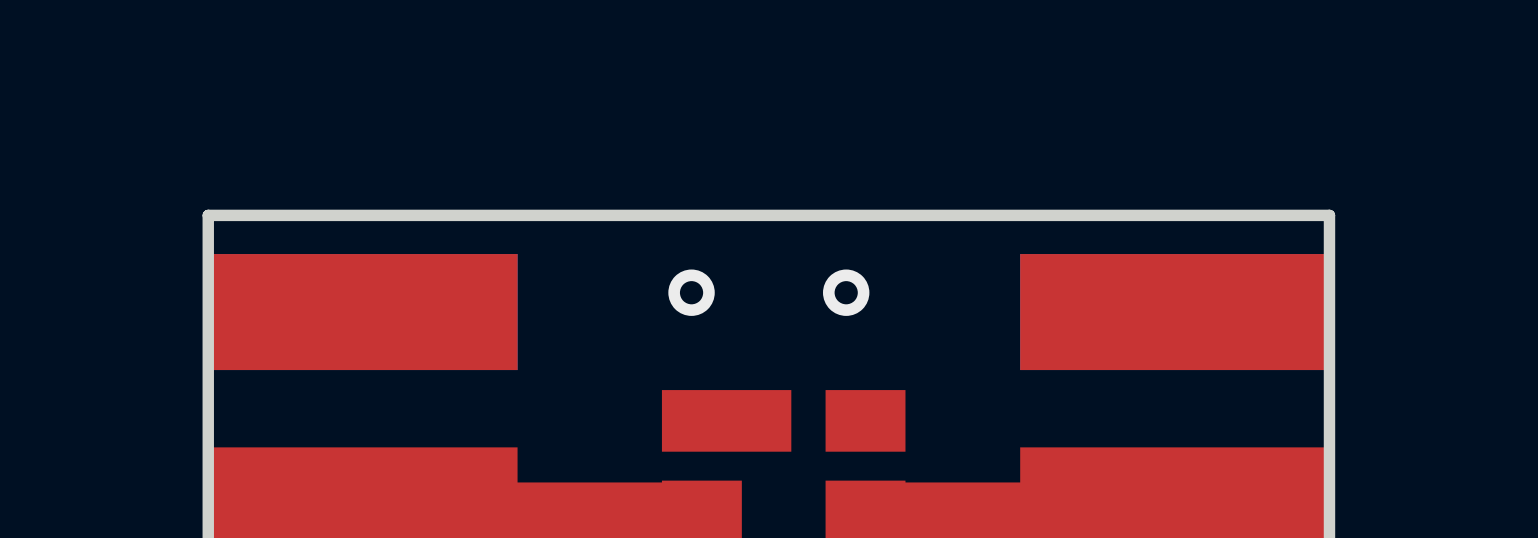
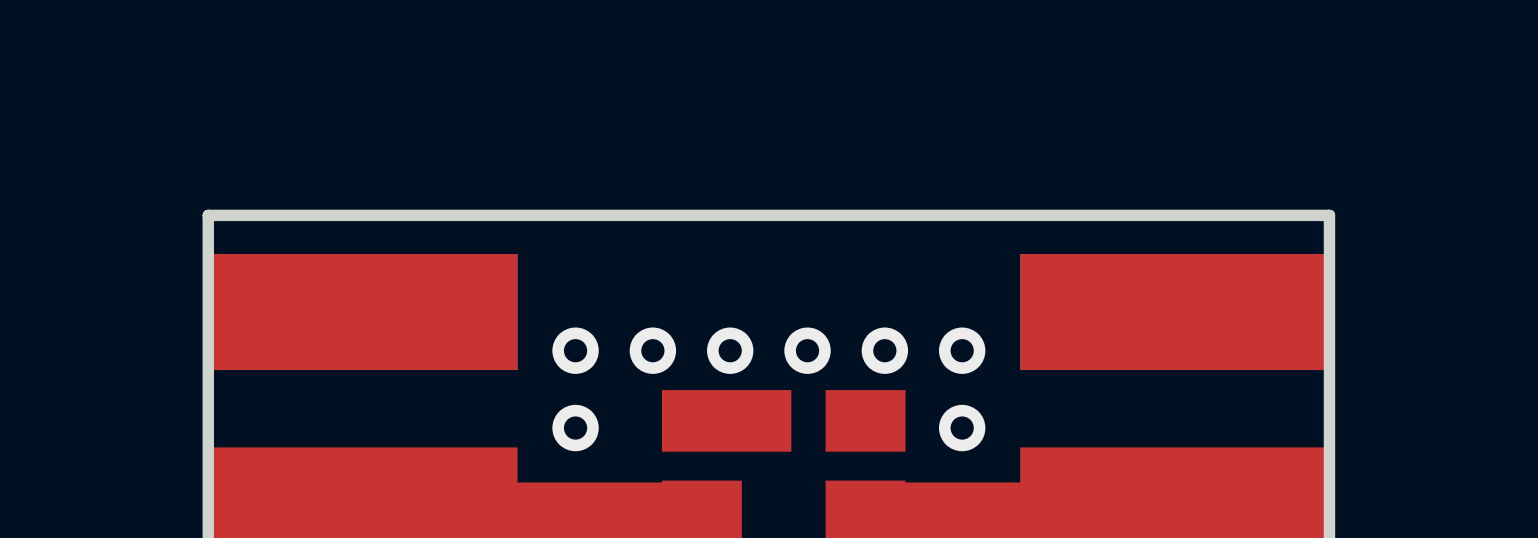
via: (691, 292) -> none
via: (846, 292) -> none
via: none -> (575, 350)
via: none -> (652, 350)
via: none -> (730, 350)
via: none -> (807, 350)
via: none -> (884, 350)
via: none -> (962, 350)
via: none -> (575, 428)
via: none -> (962, 428)

